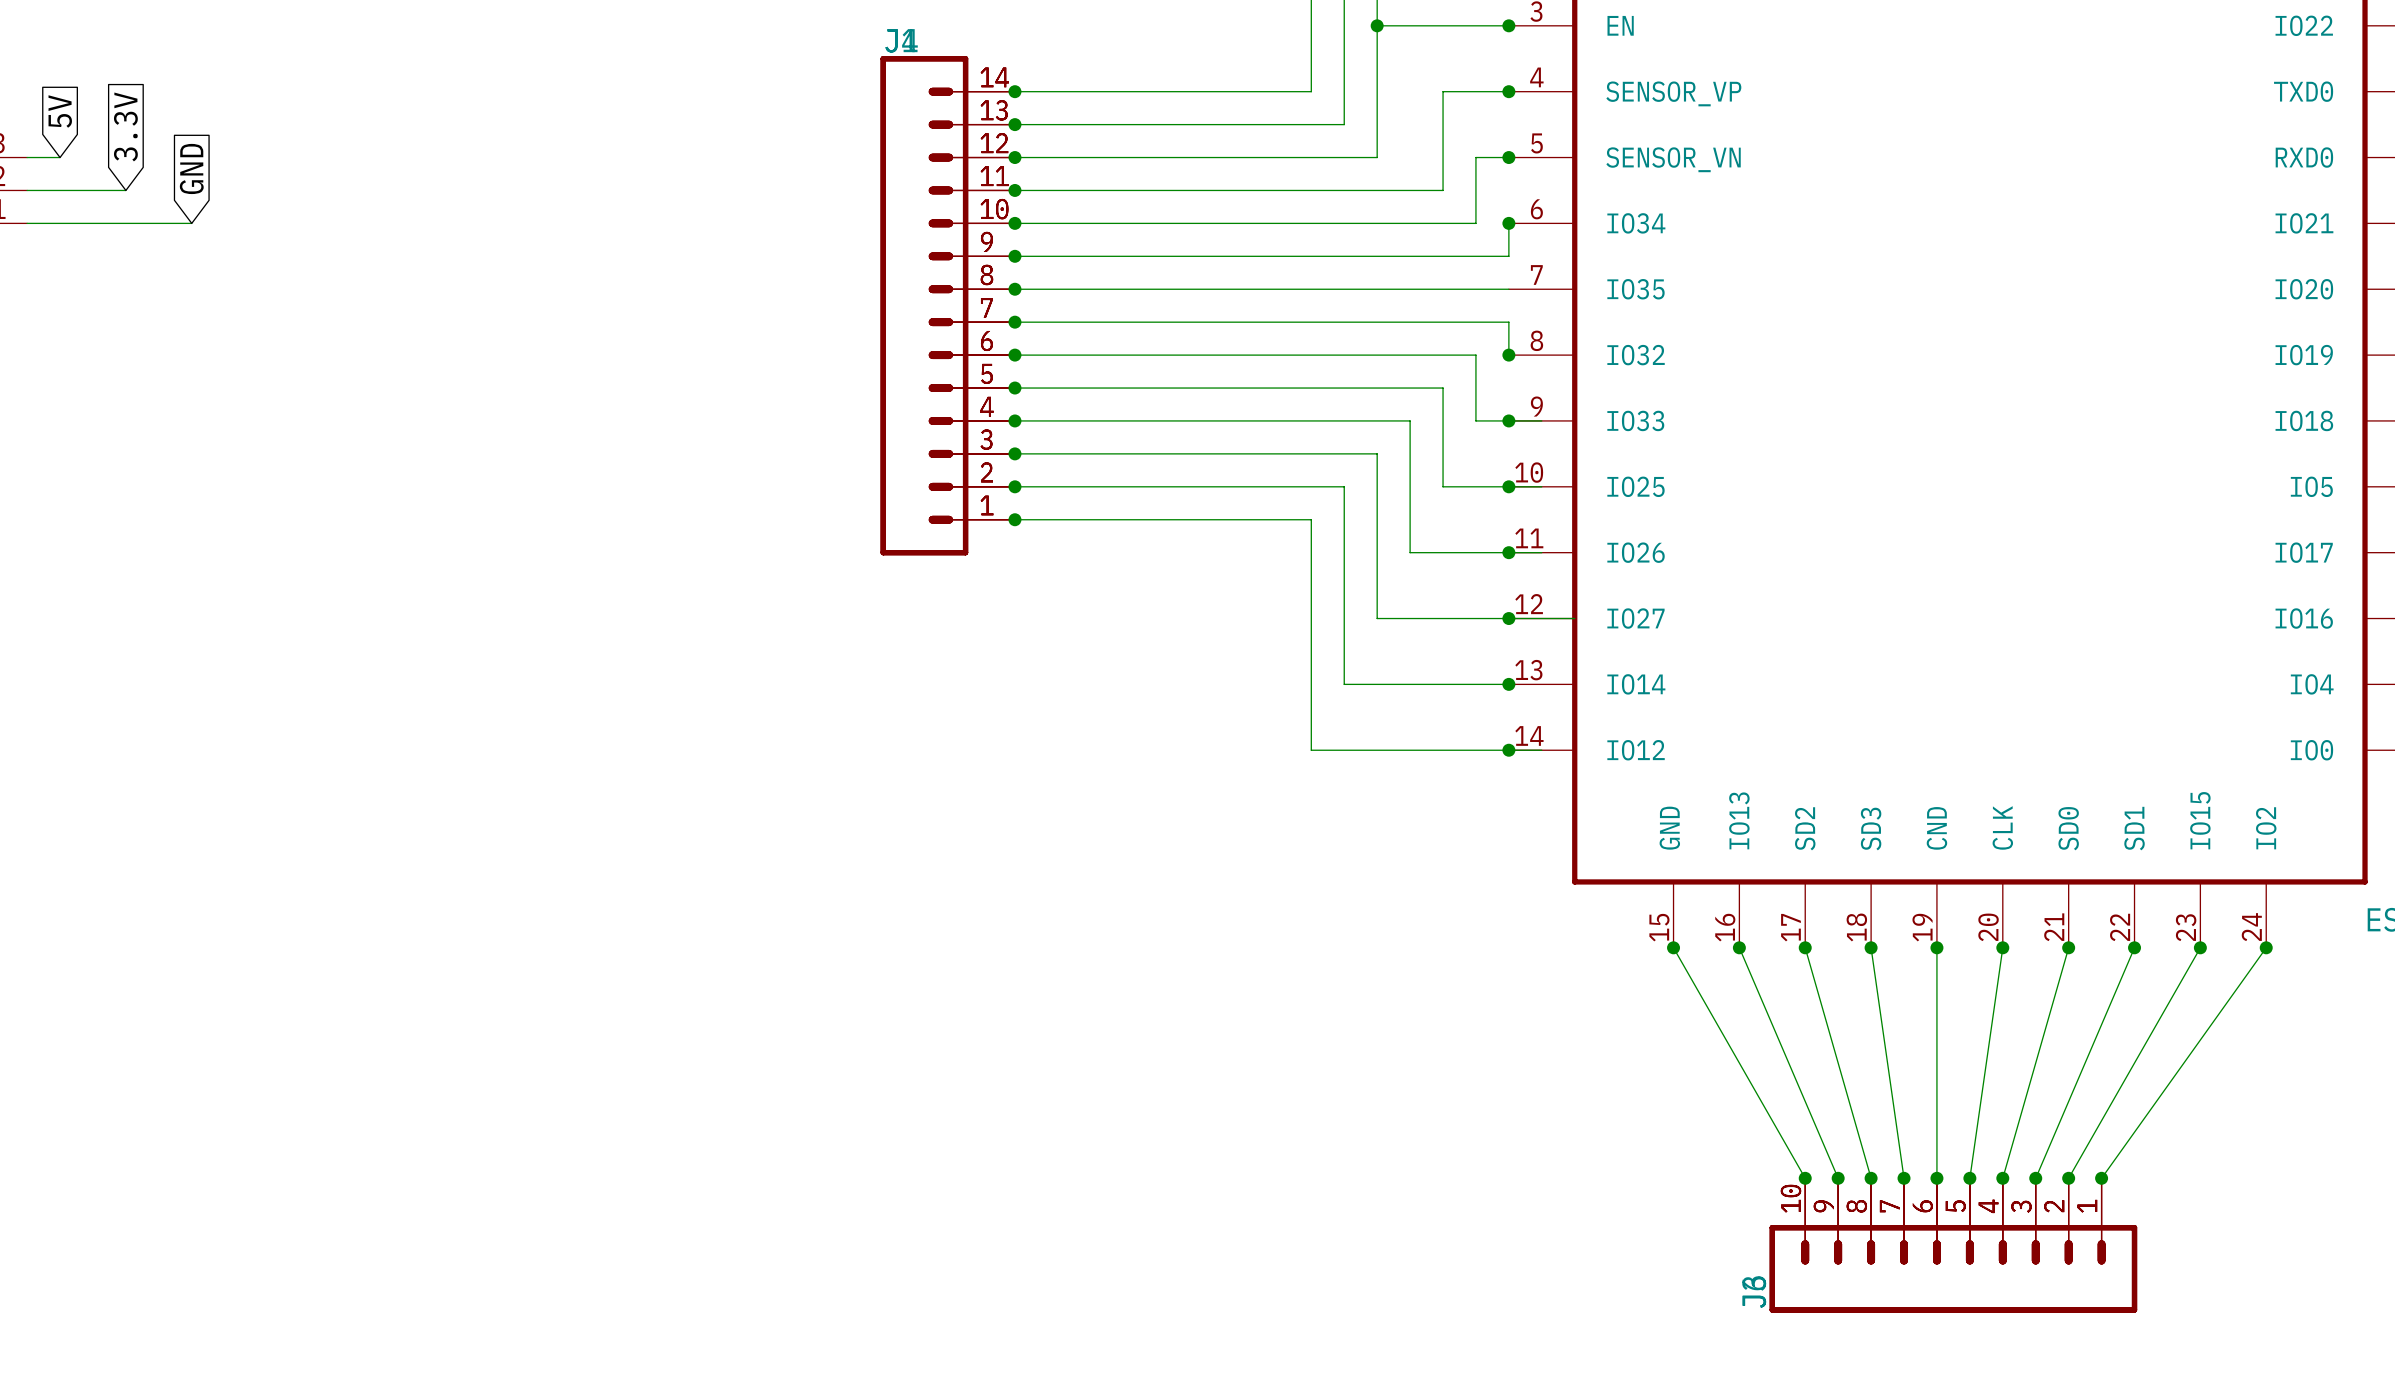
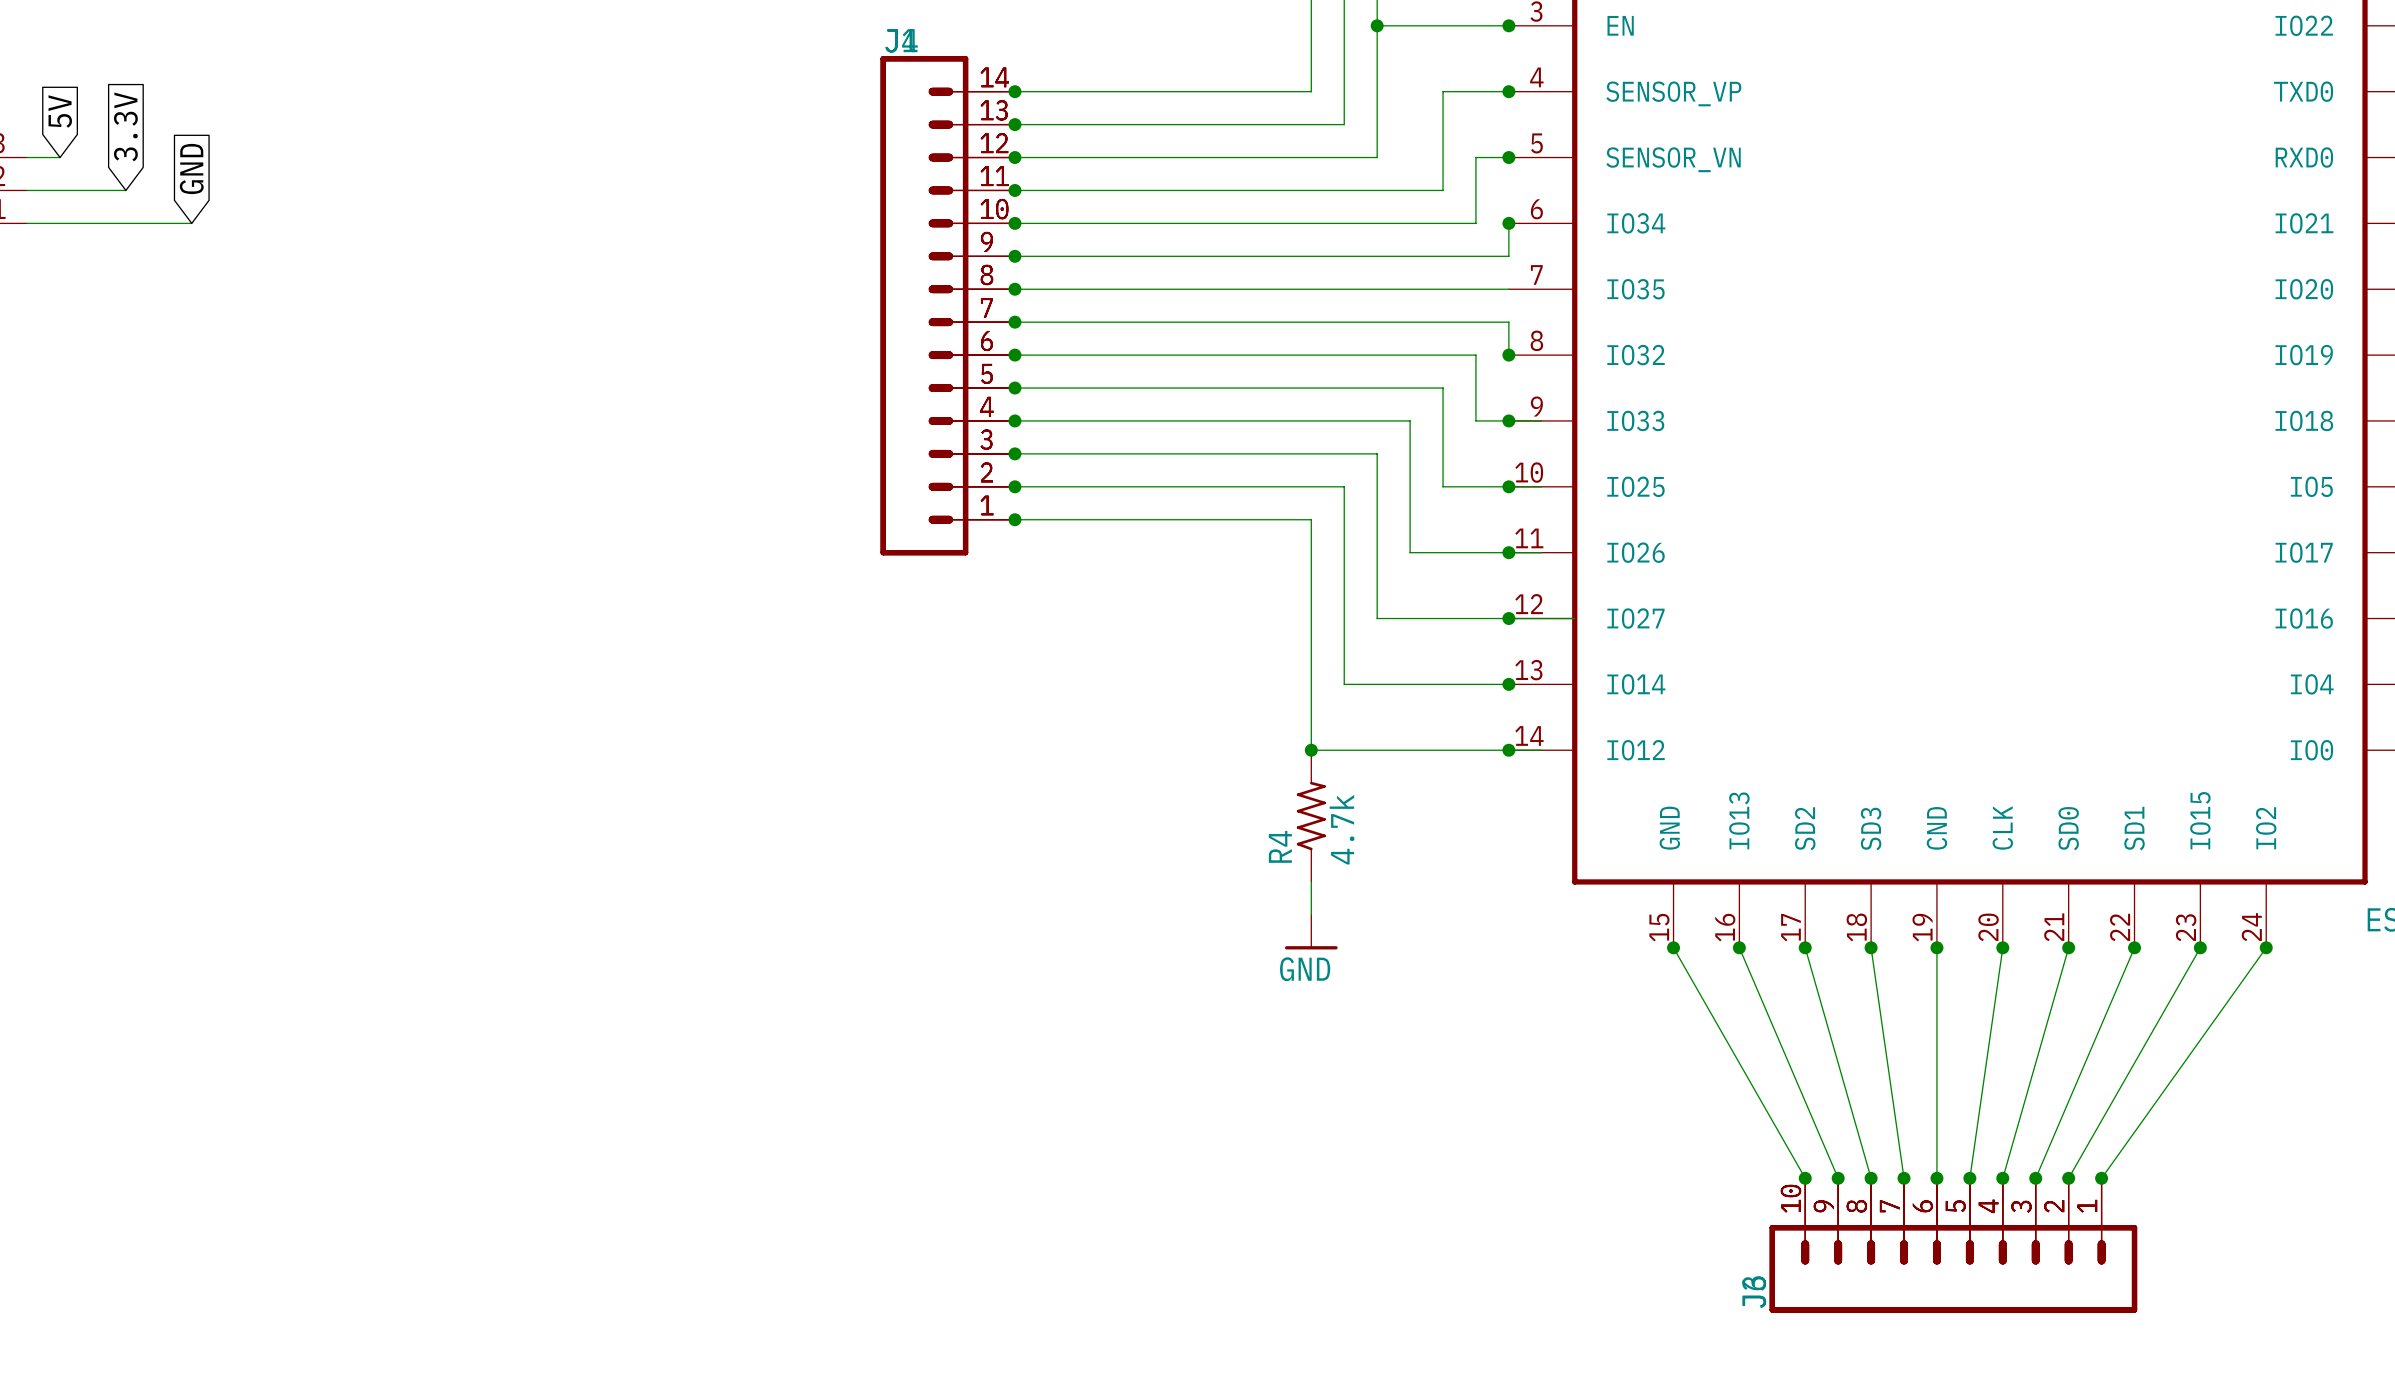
junction: none -> (1311, 750)
R4: none -> 4.7k (1311, 816)
wire: none -> (1311, 881) (1311, 914)
power symbol: none -> GND (1311, 932)

